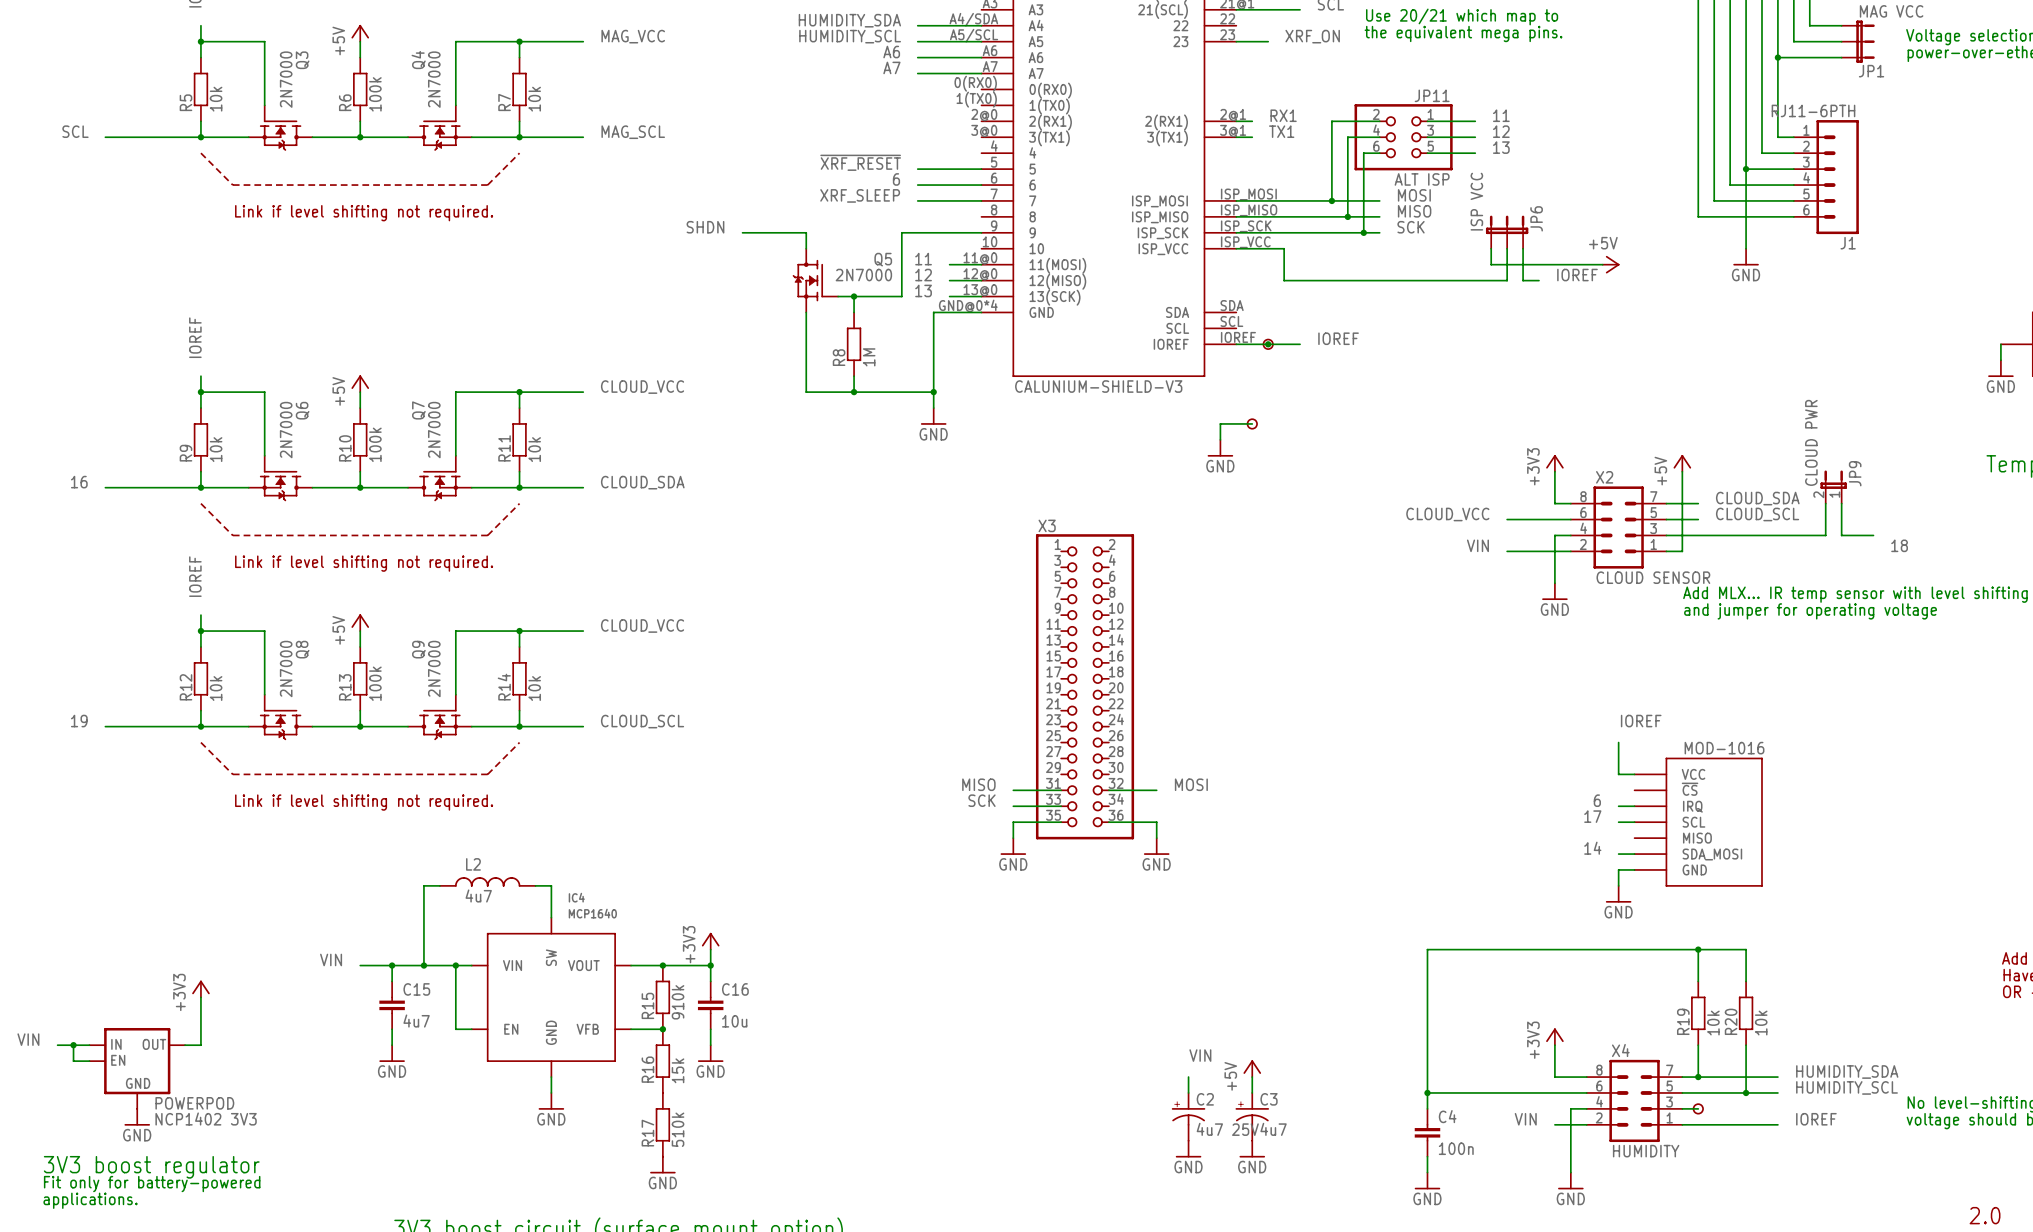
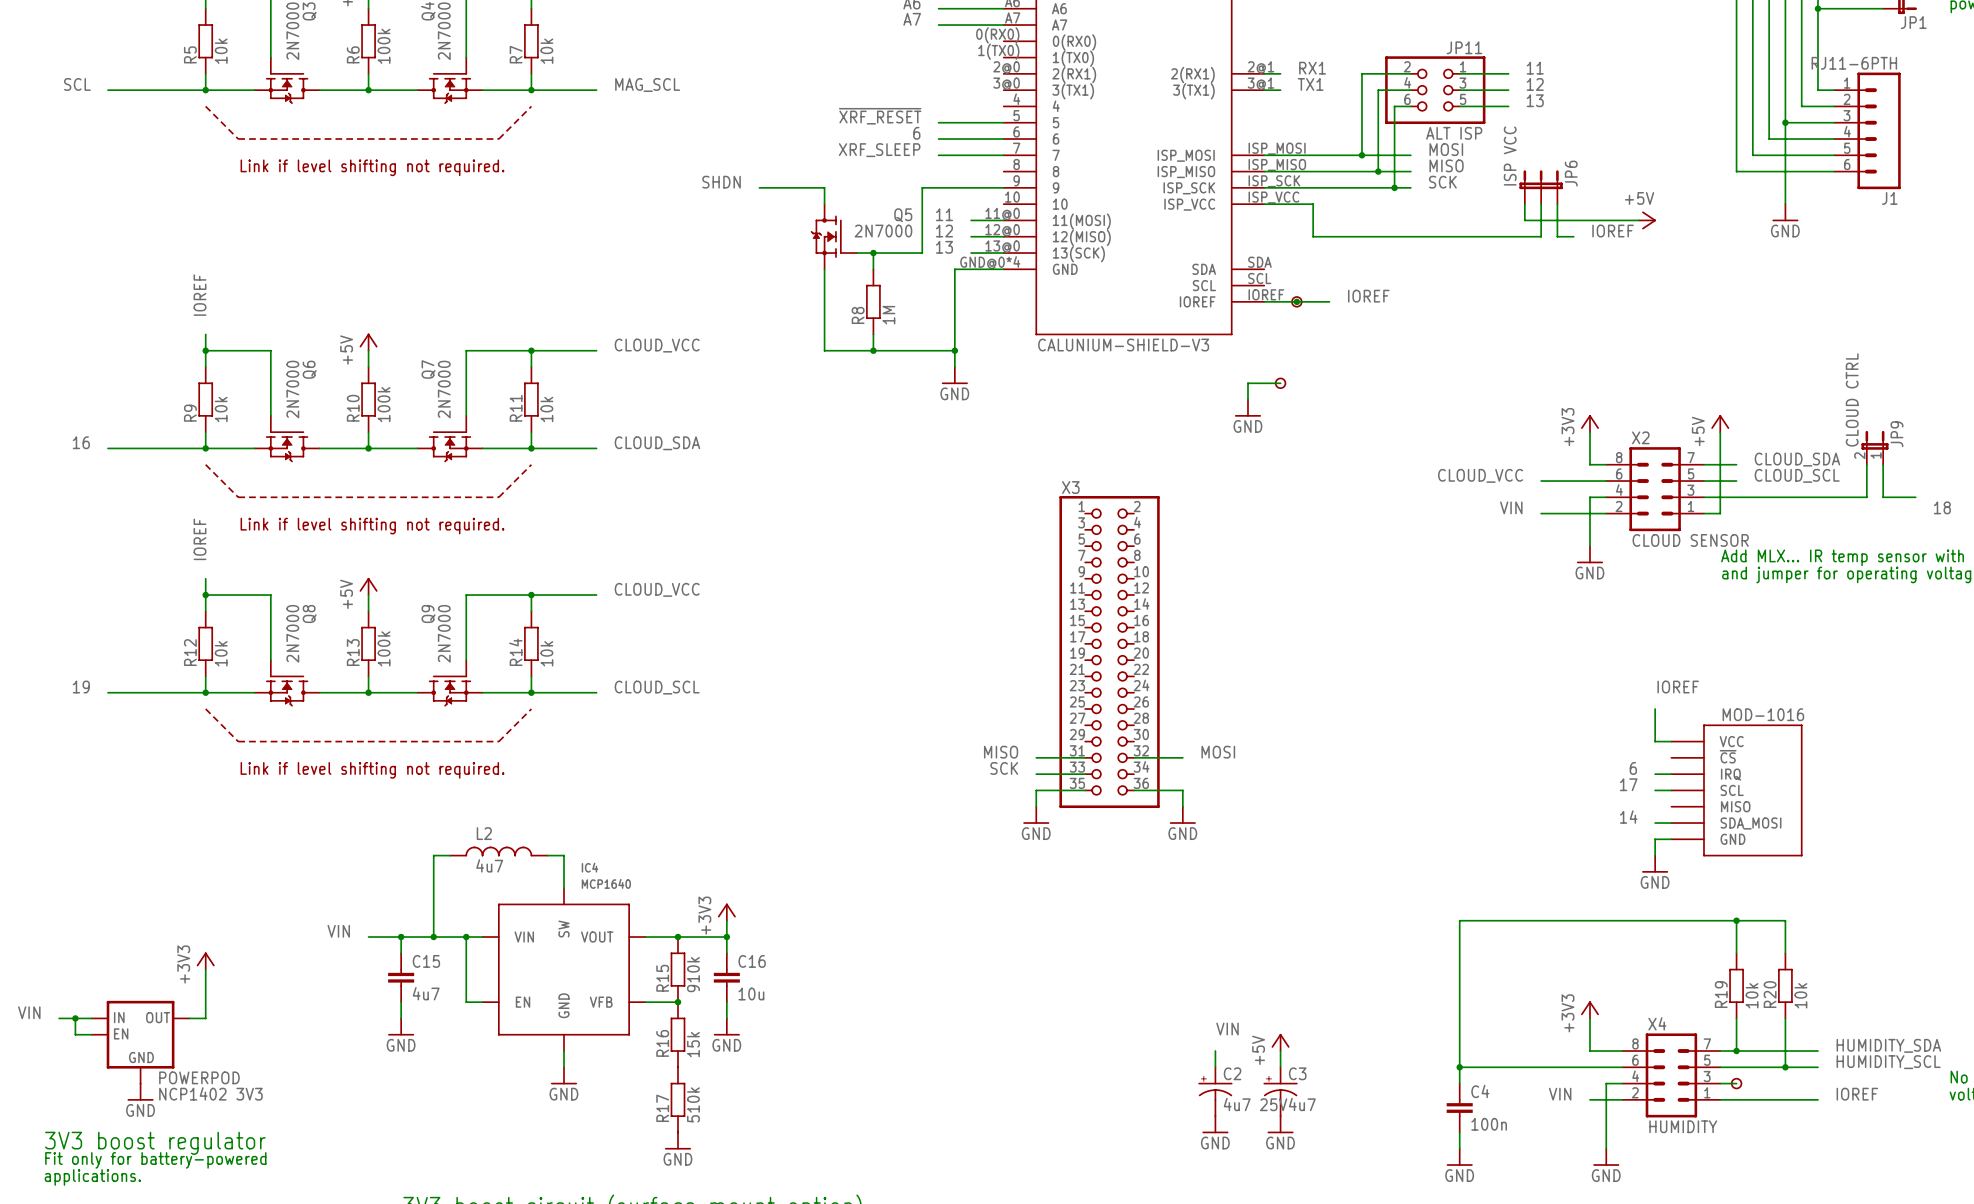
JP9 value: CLOUD PWR (1811, 442) -> CLOUD CTRL (1852, 399)

